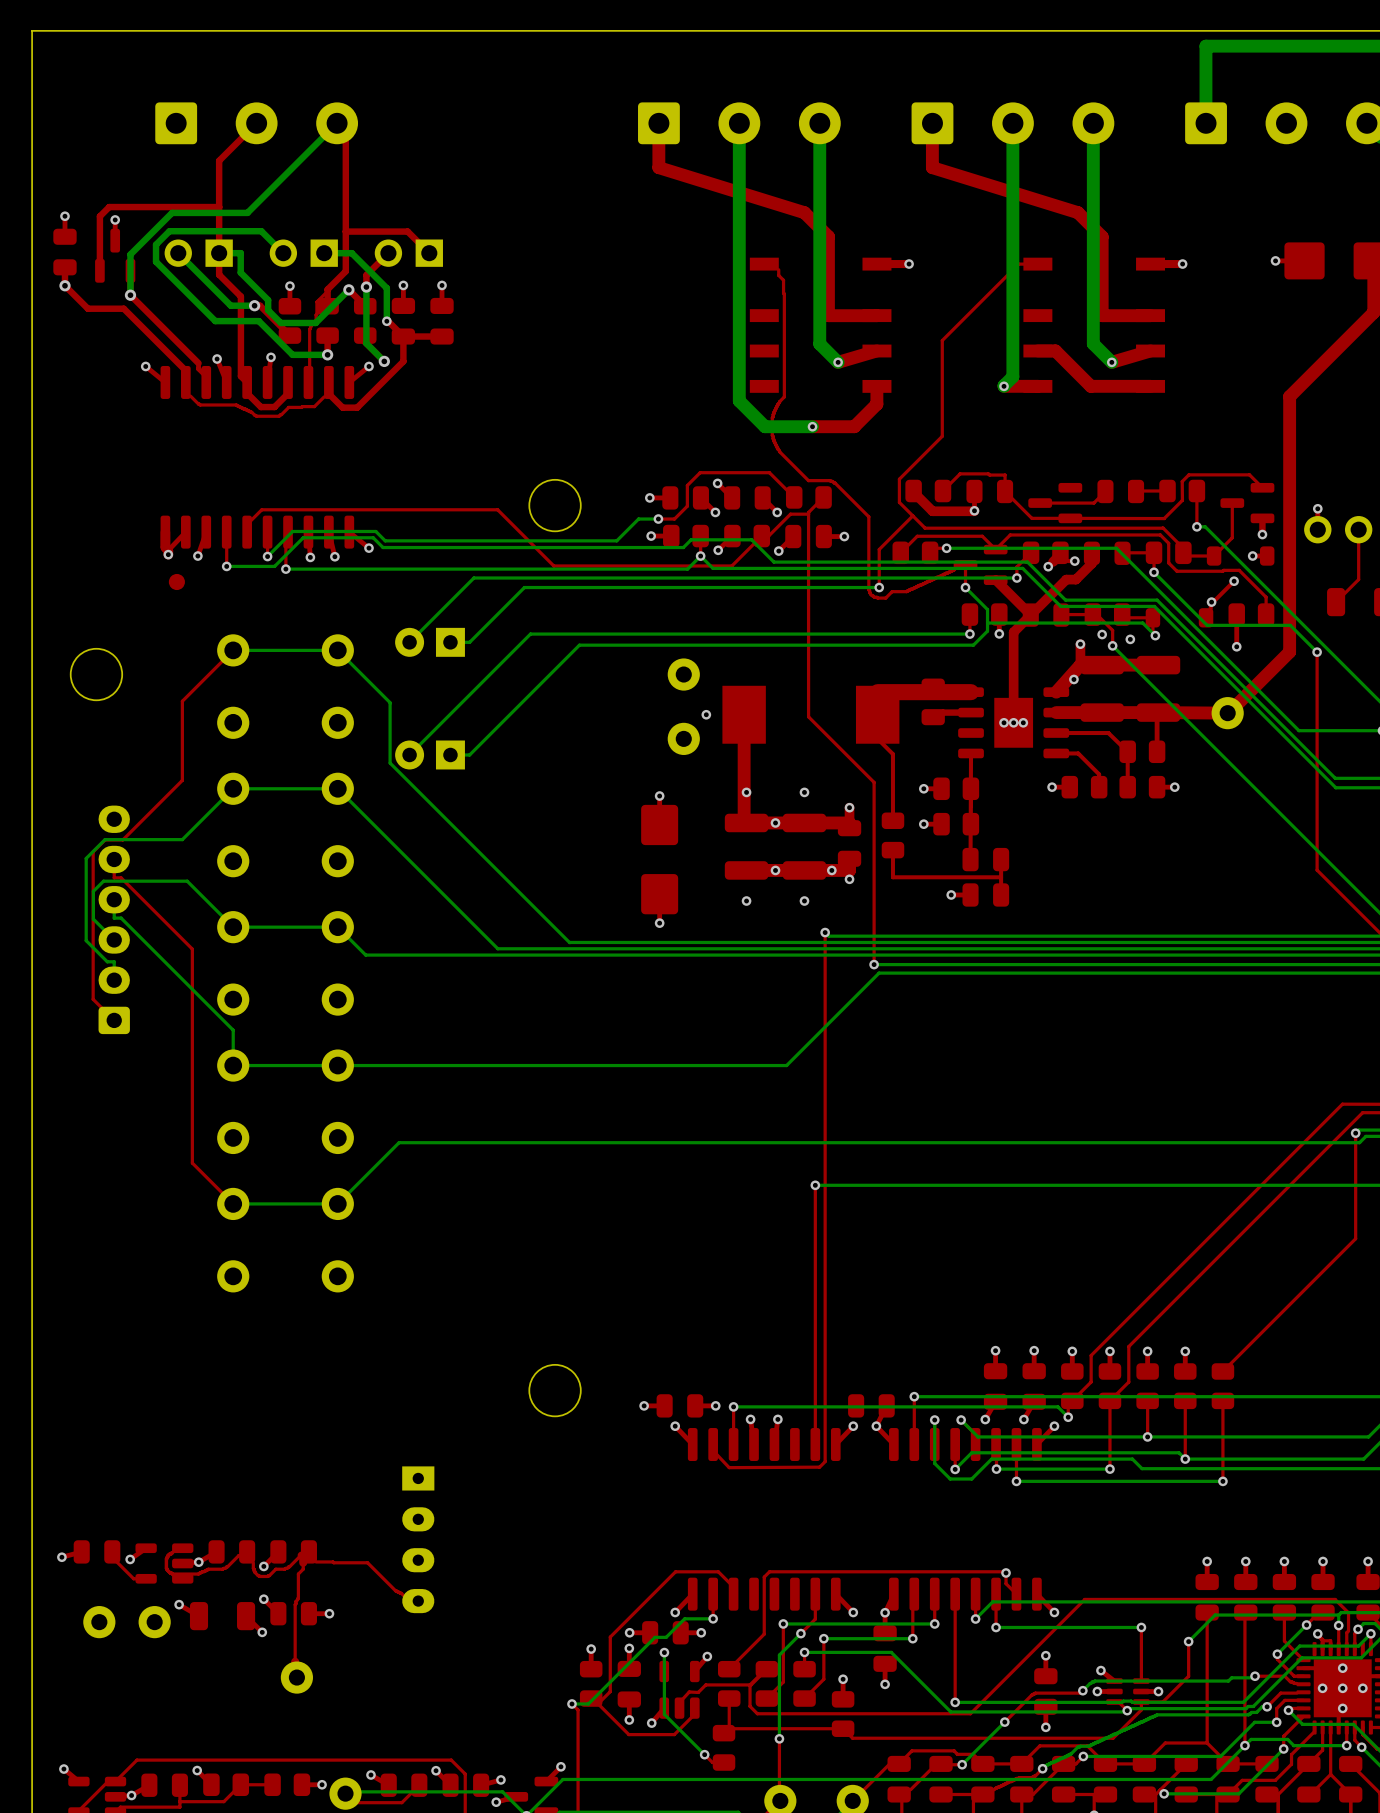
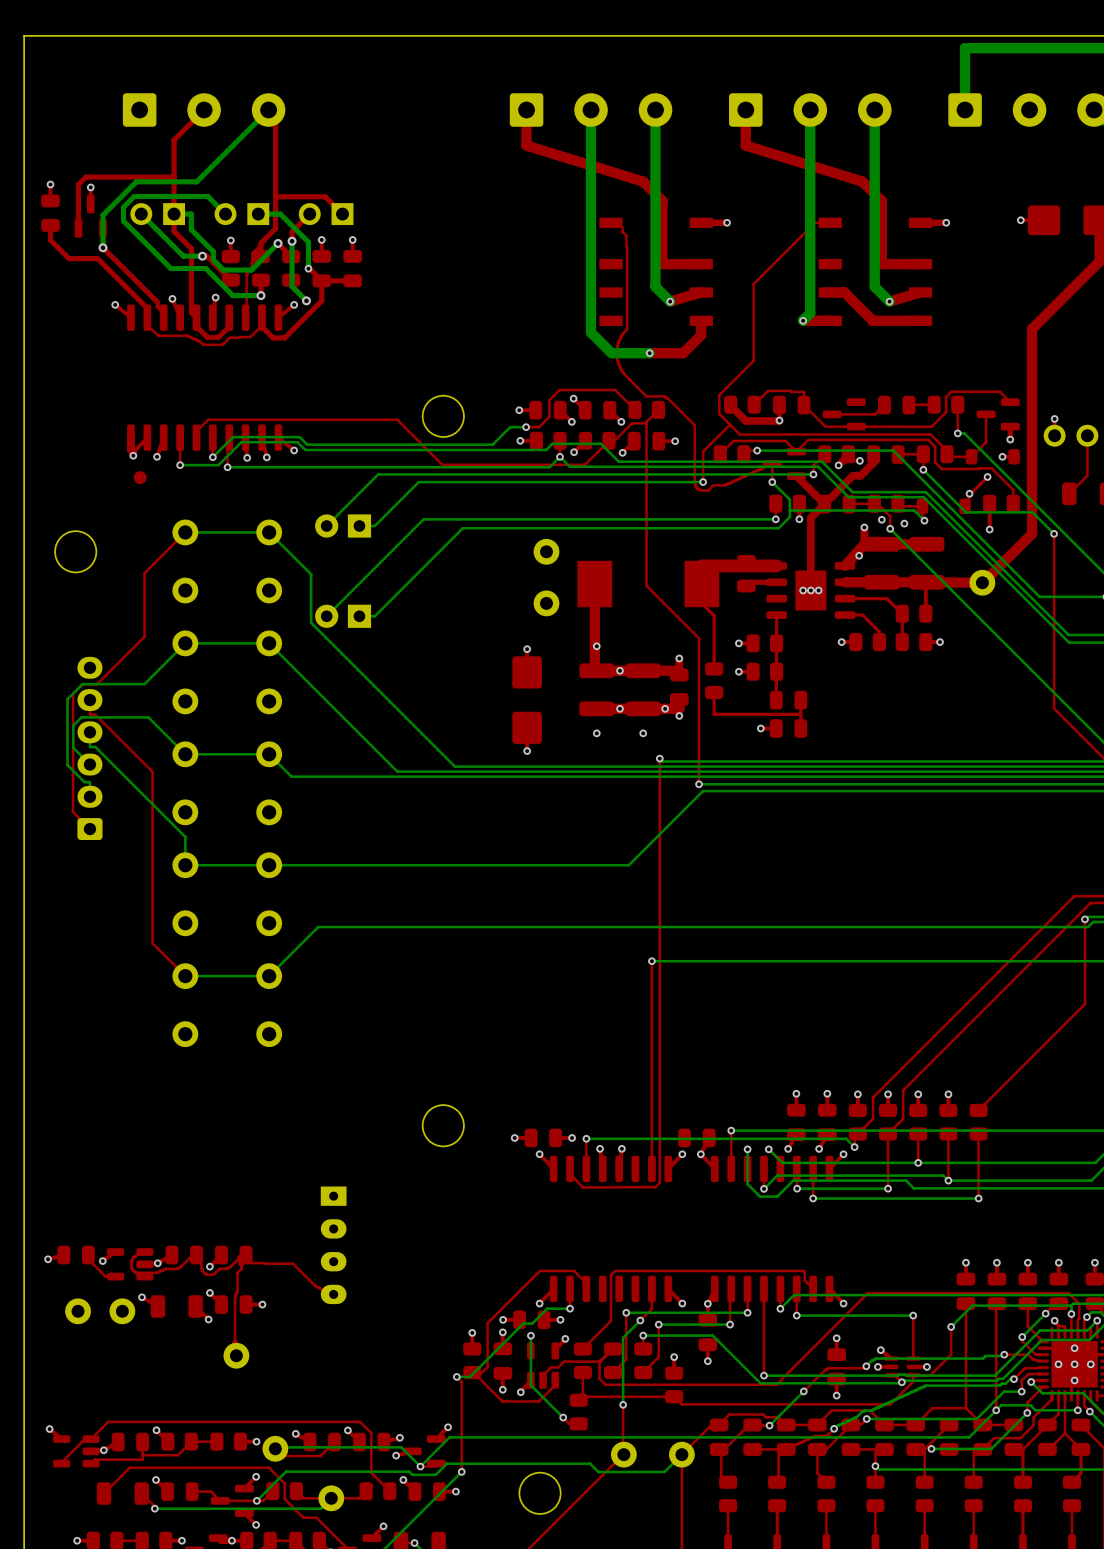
via: (64, 285) -> none
via: (706, 714) -> none
via: (804, 792) -> none
via: (1006, 1572) -> none

